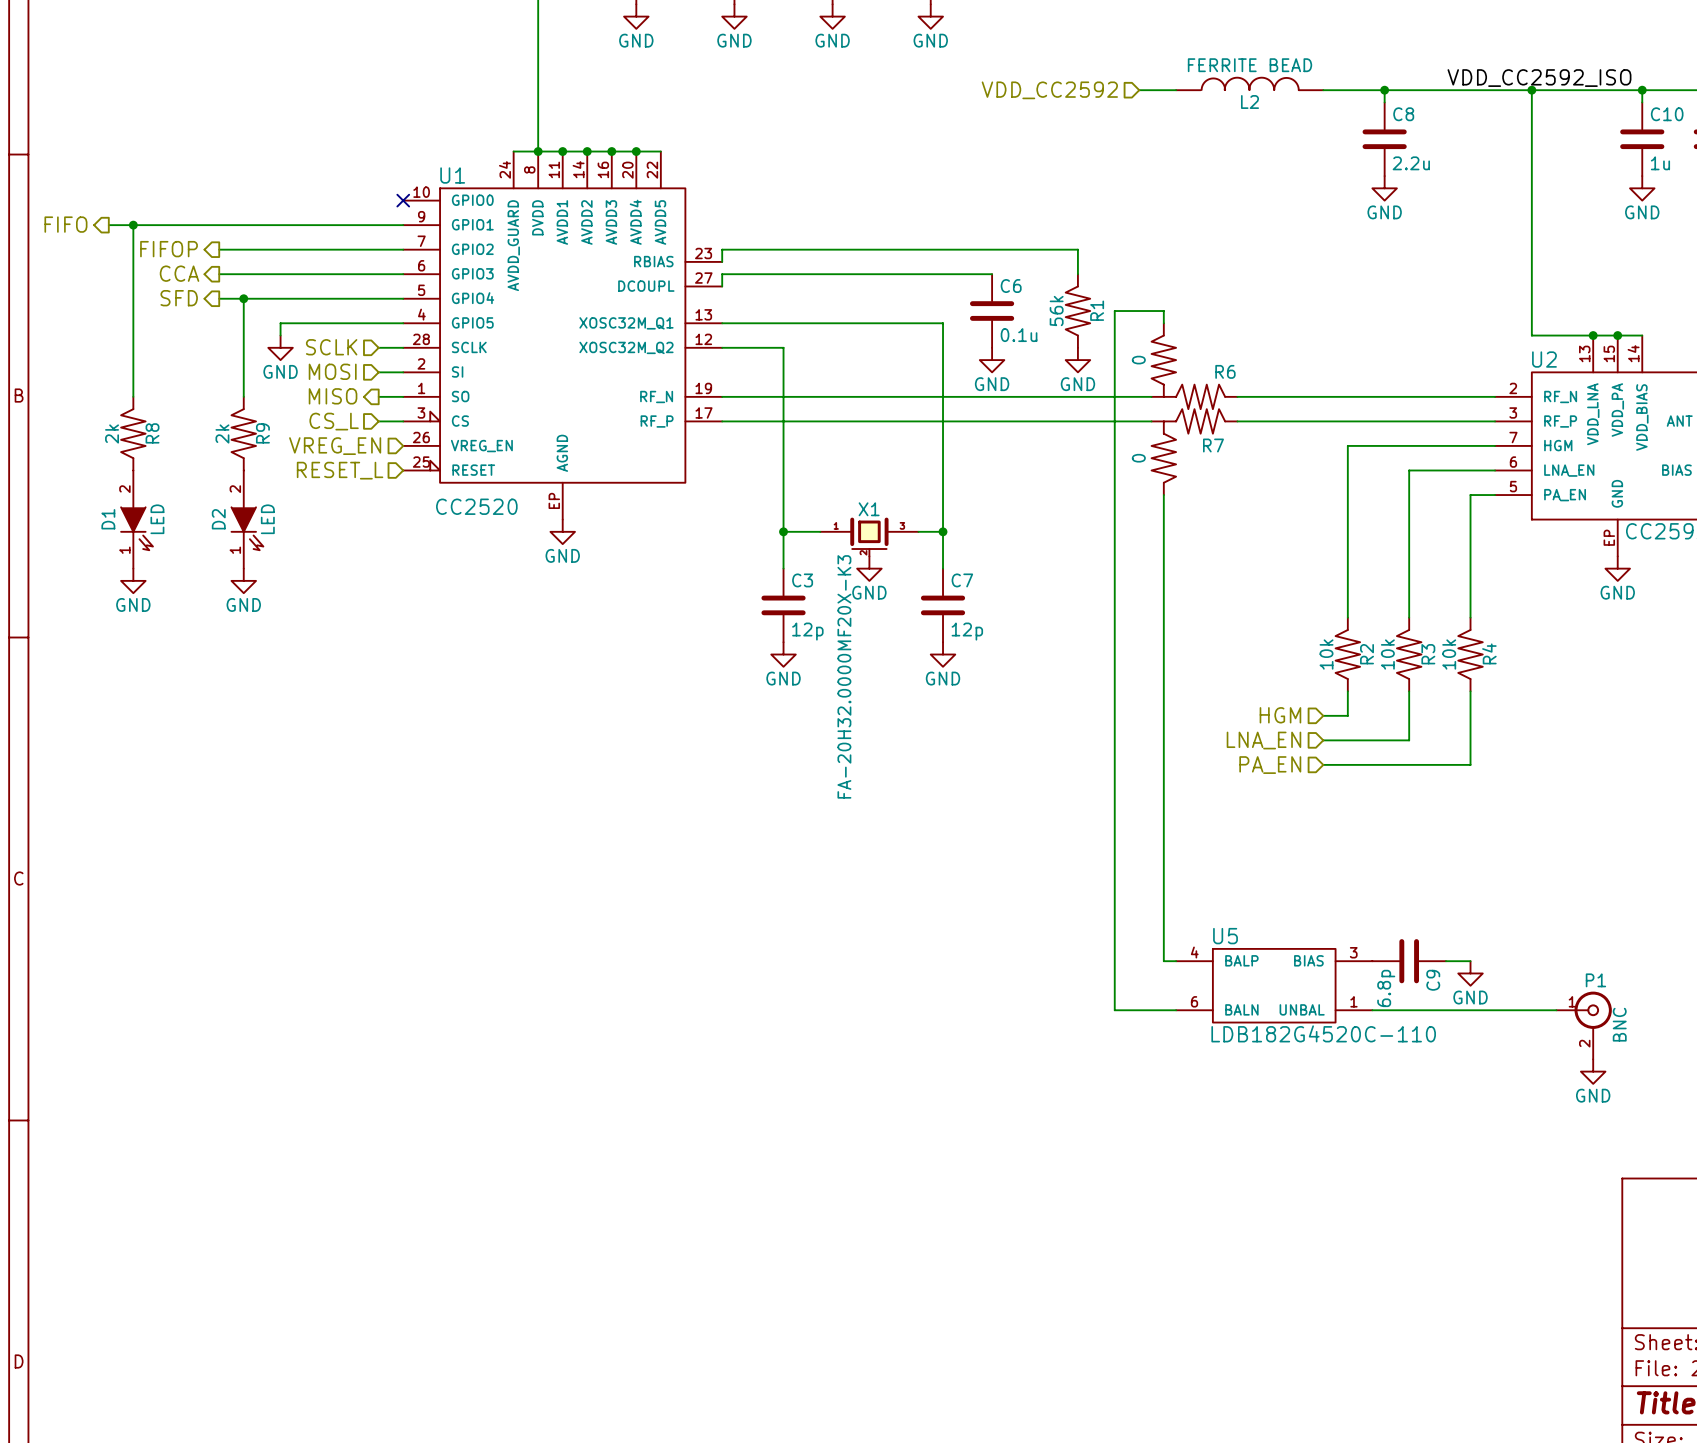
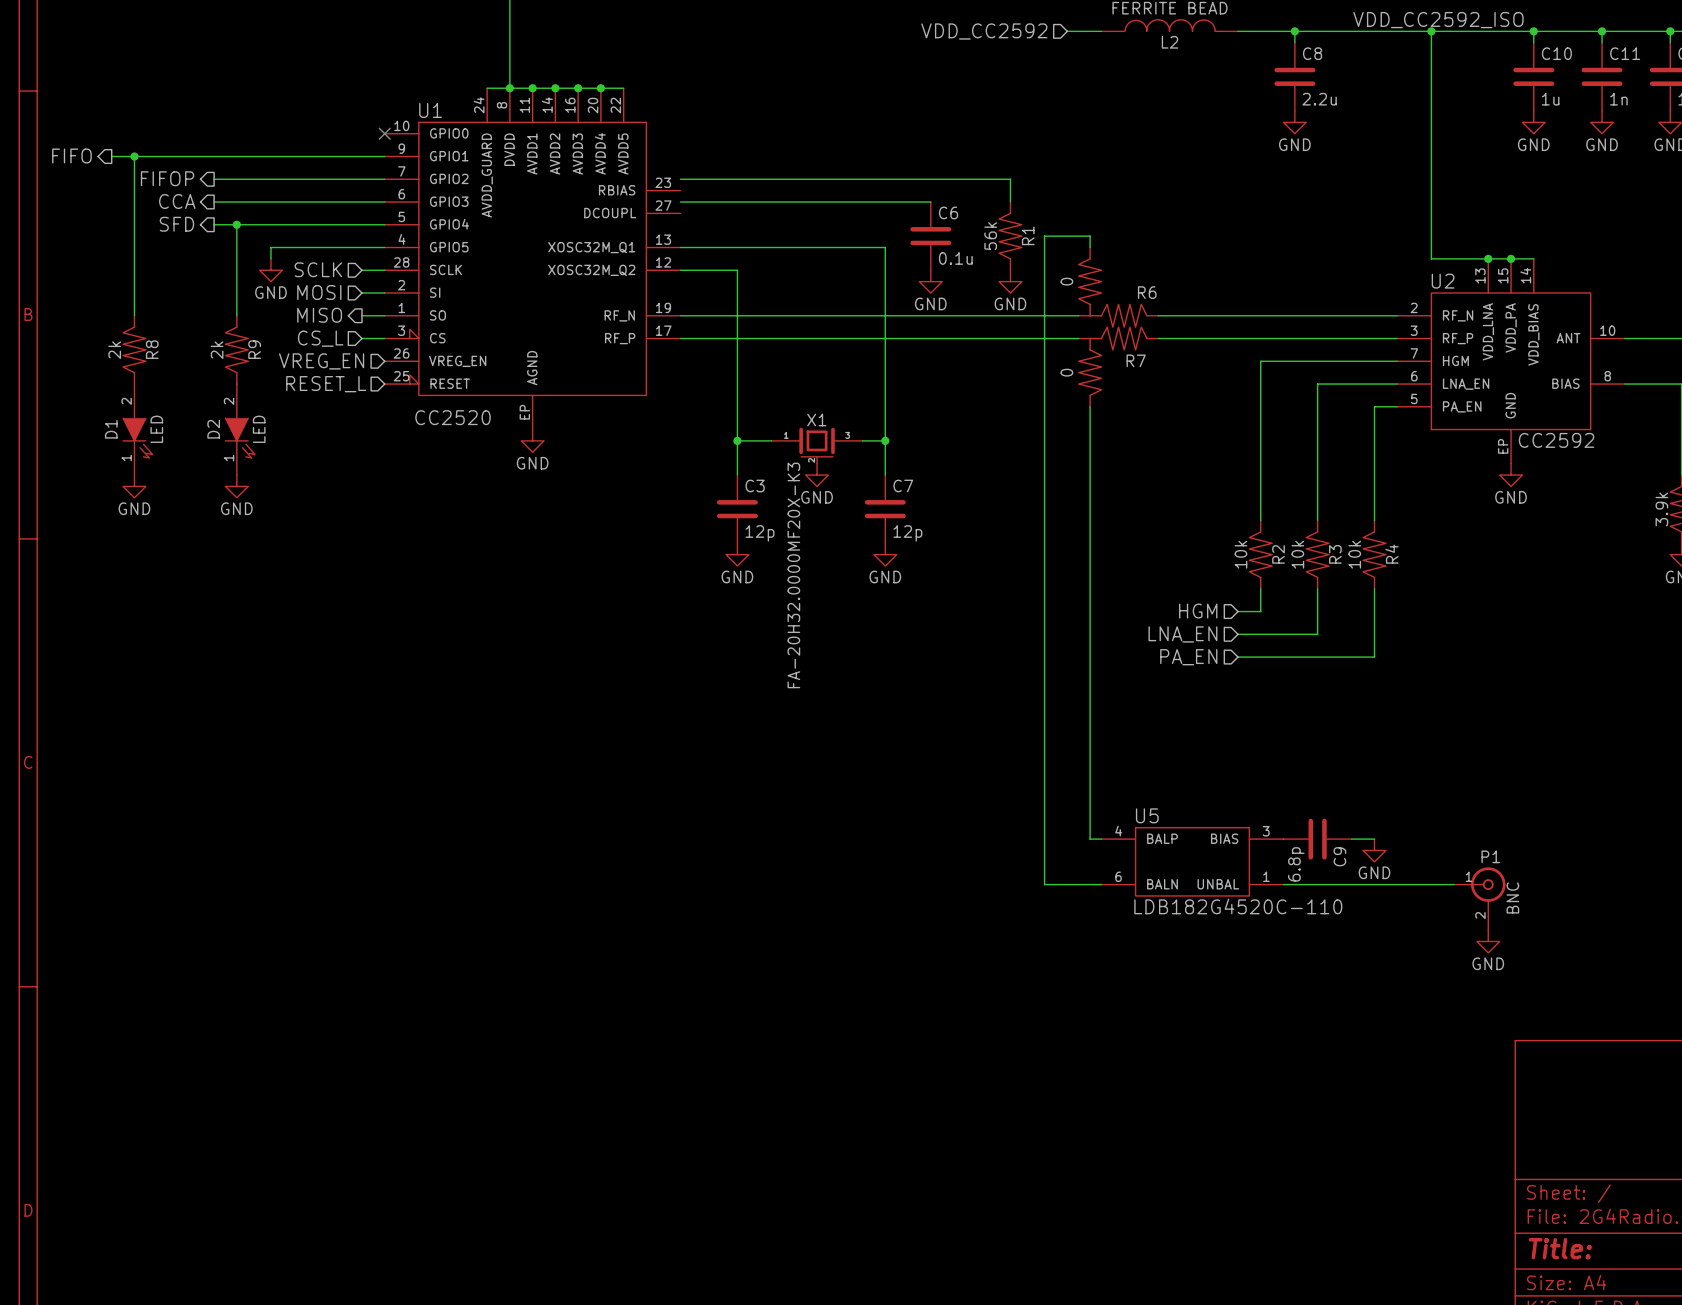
wire: (722, 249) (722, 261) -> none
wire: (722, 274) (722, 286) -> none

